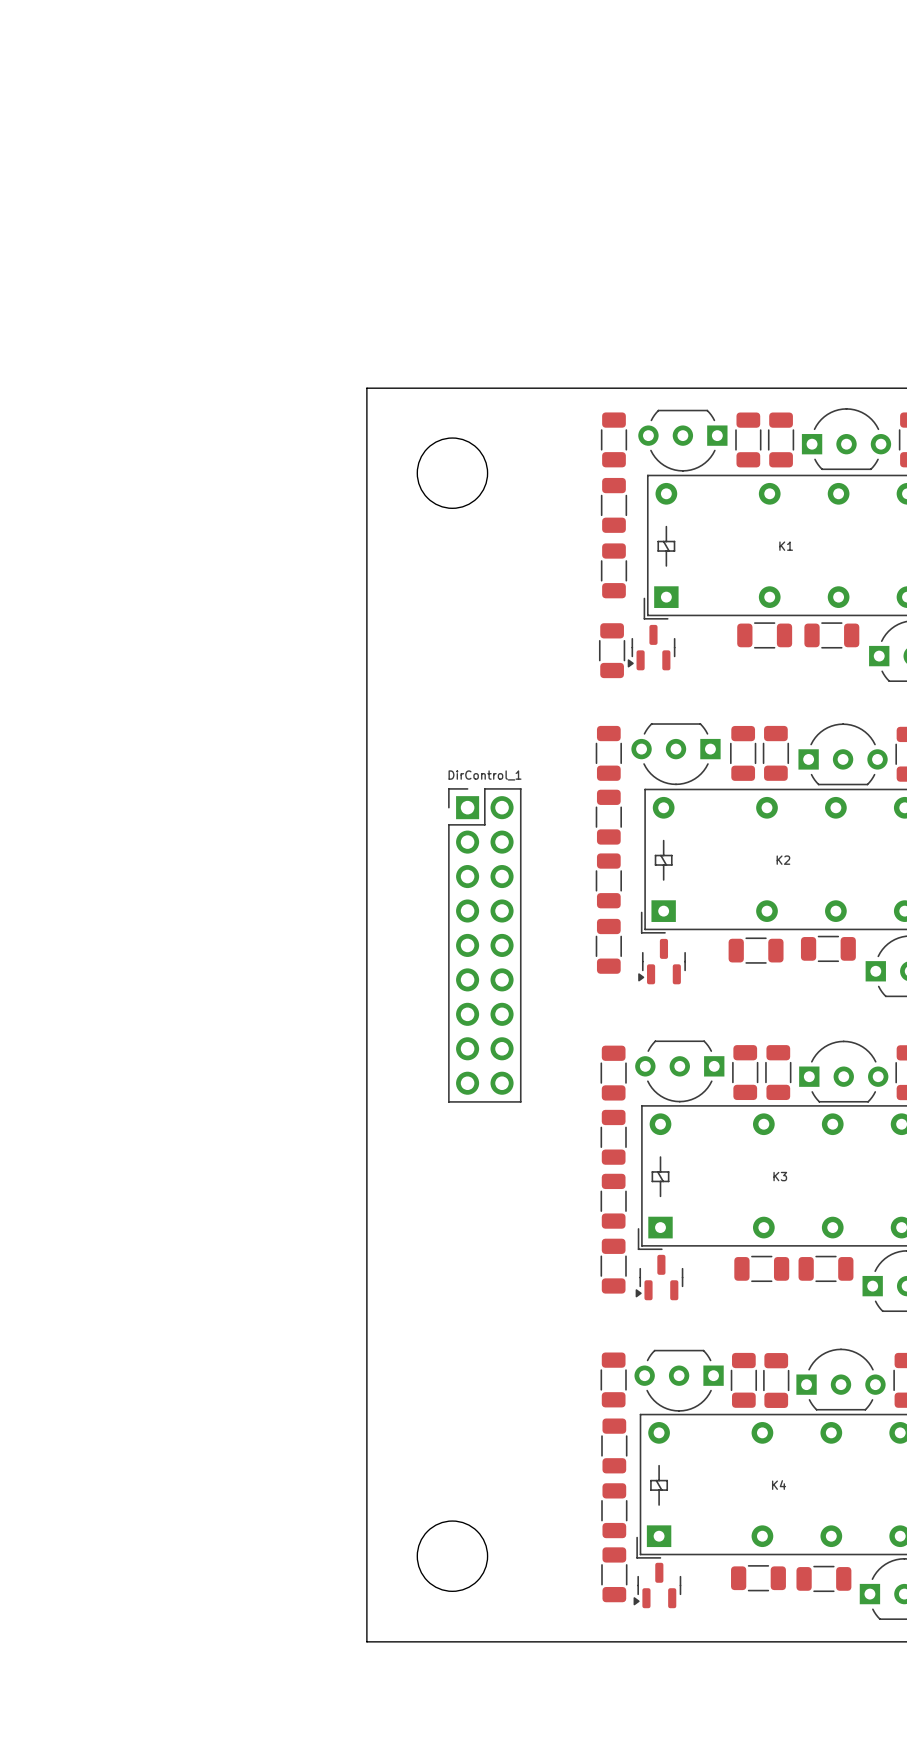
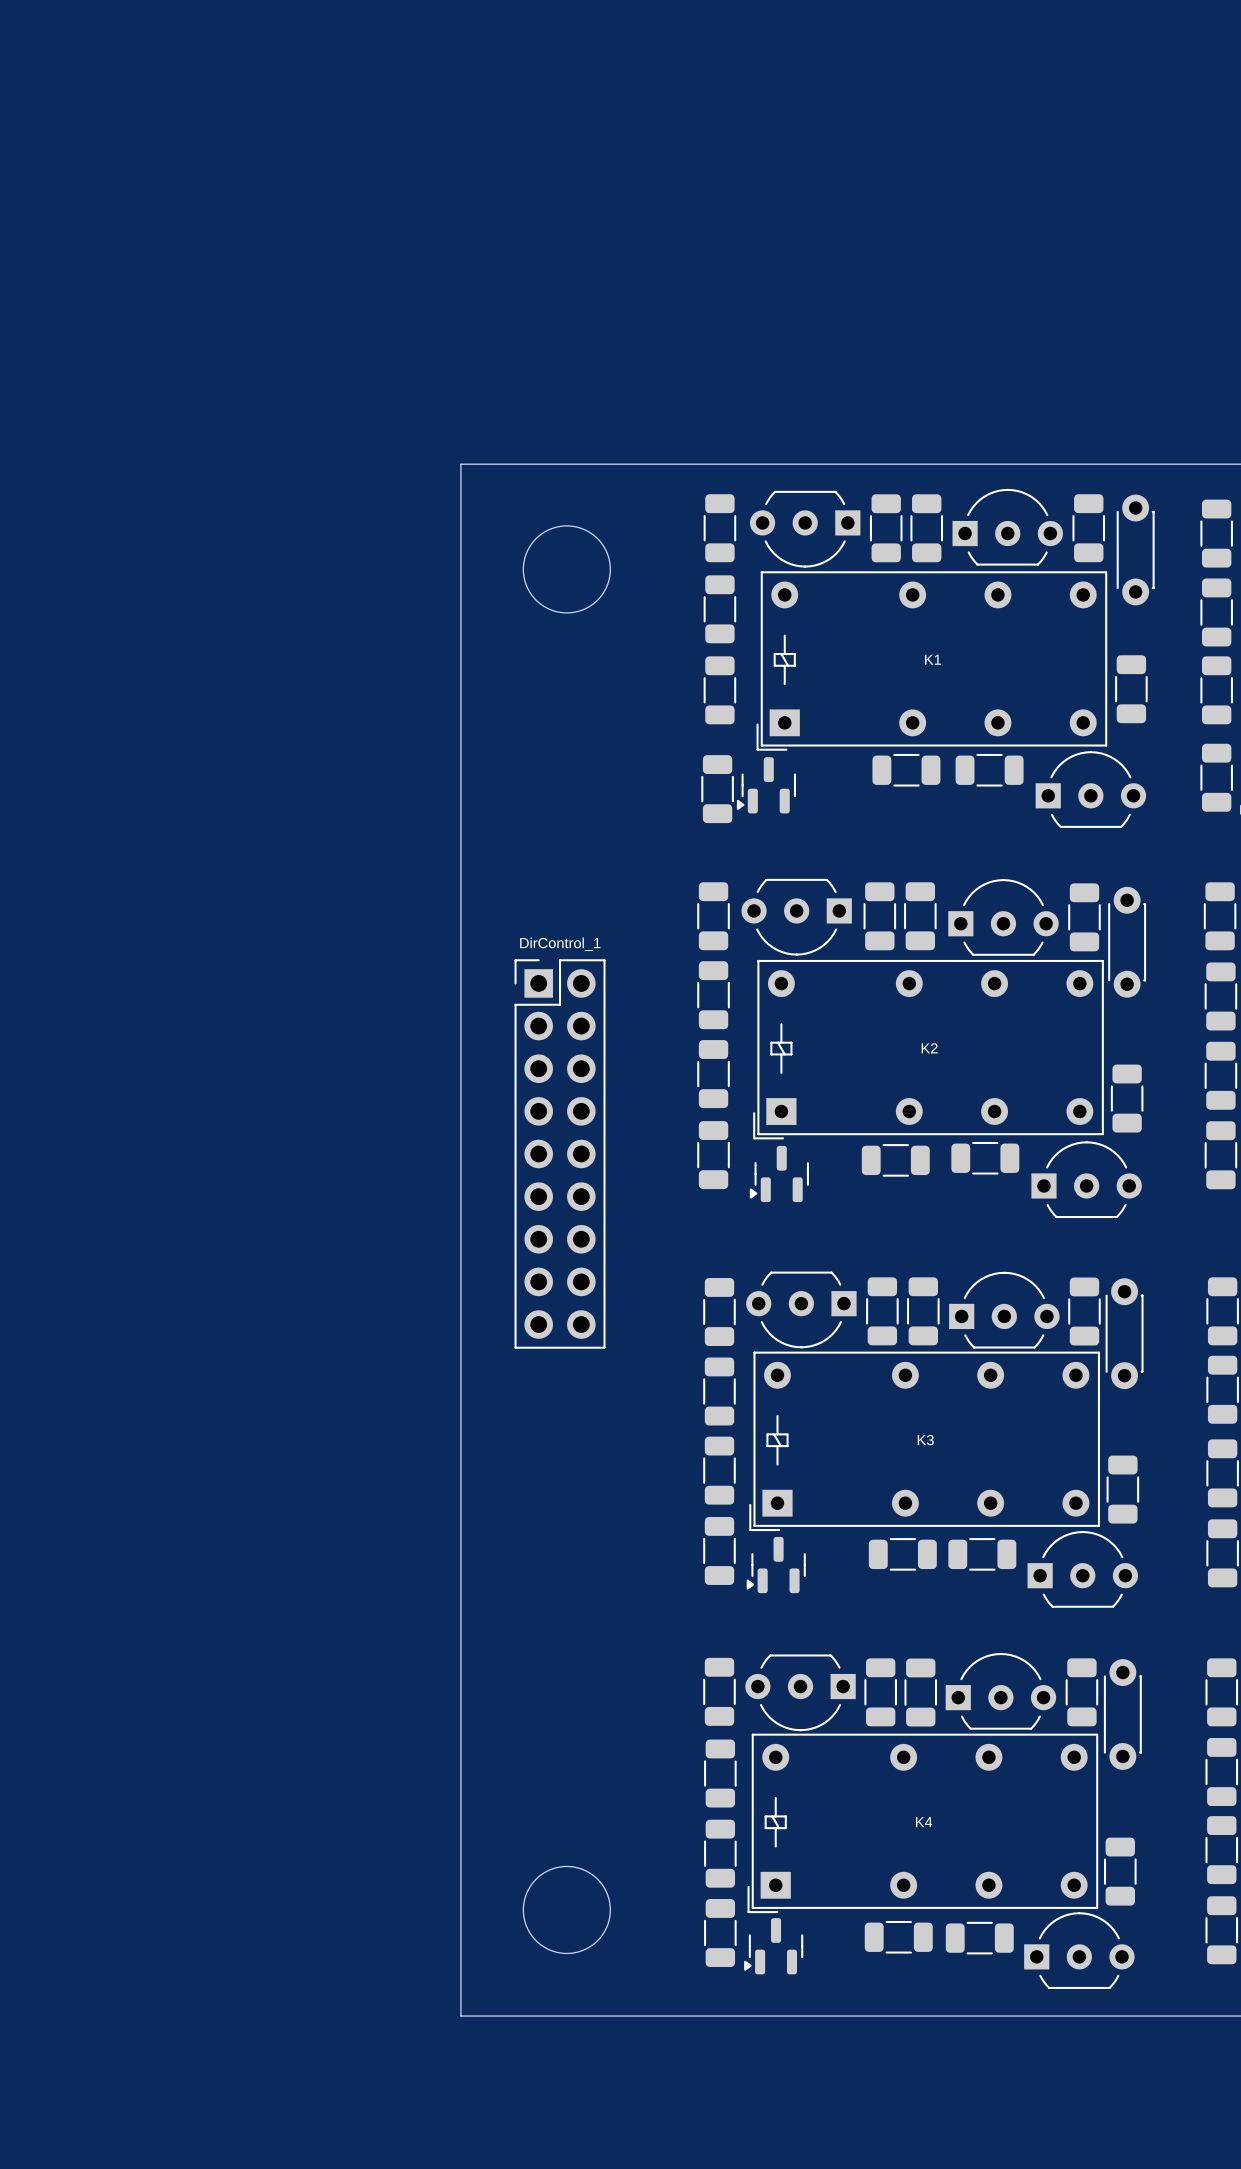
board edge: (404, 388) (366, 388) (366, 1641) (404, 1641) -> (460, 464) (460, 2016)
round board edge position: (452, 473) -> (566, 569)
round board edge position: (452, 1556) -> (566, 1909)

